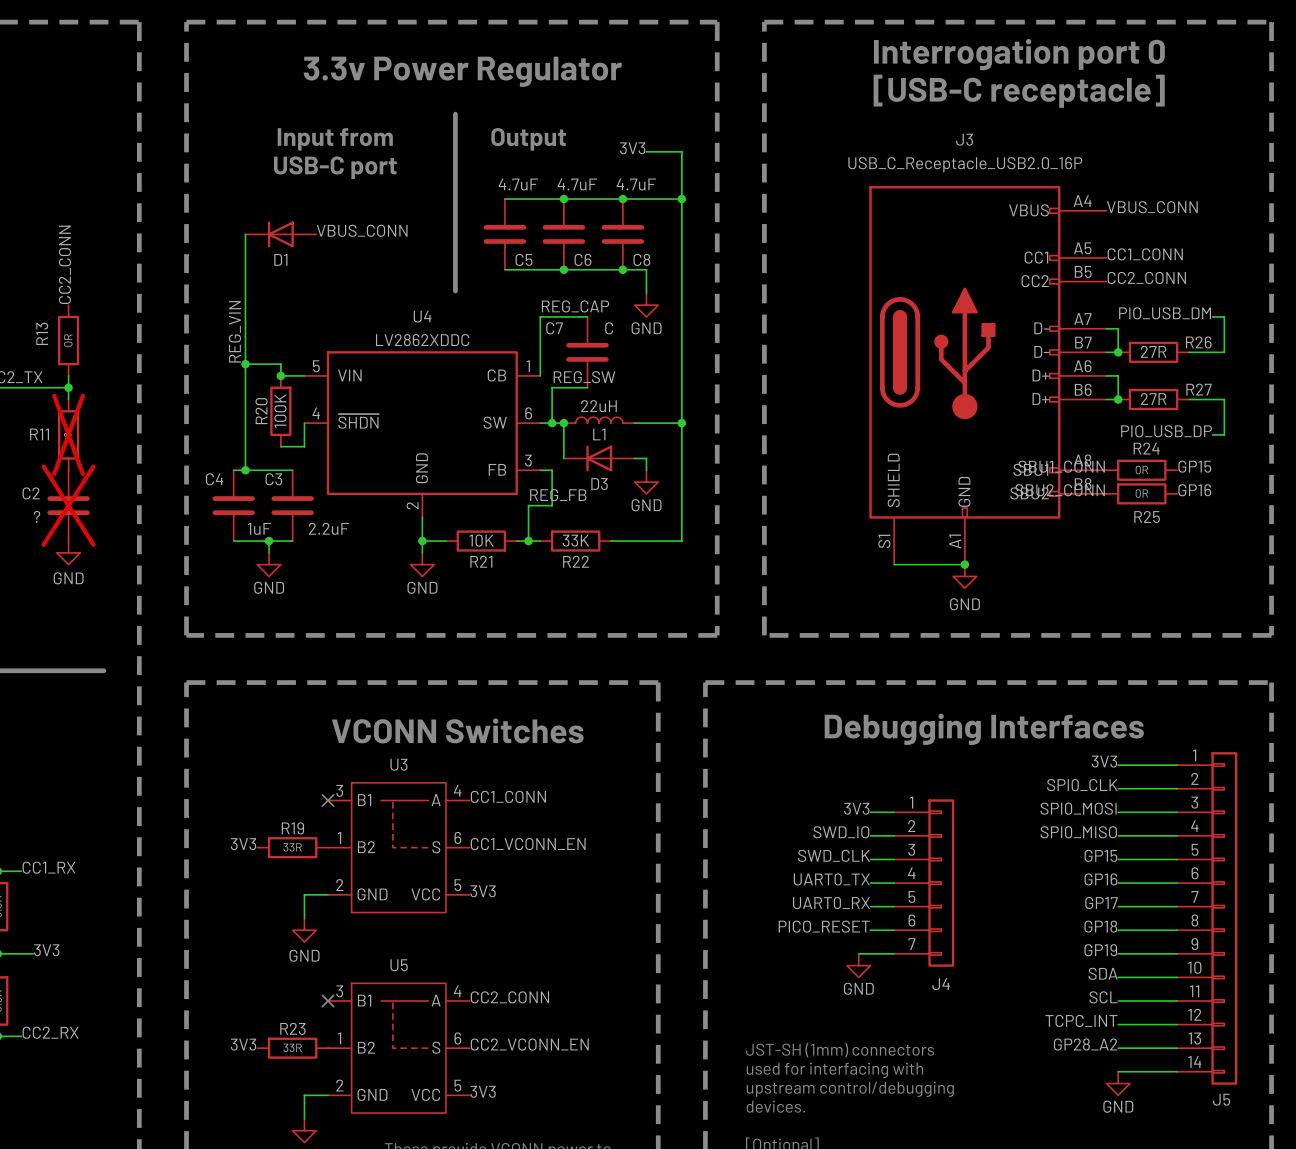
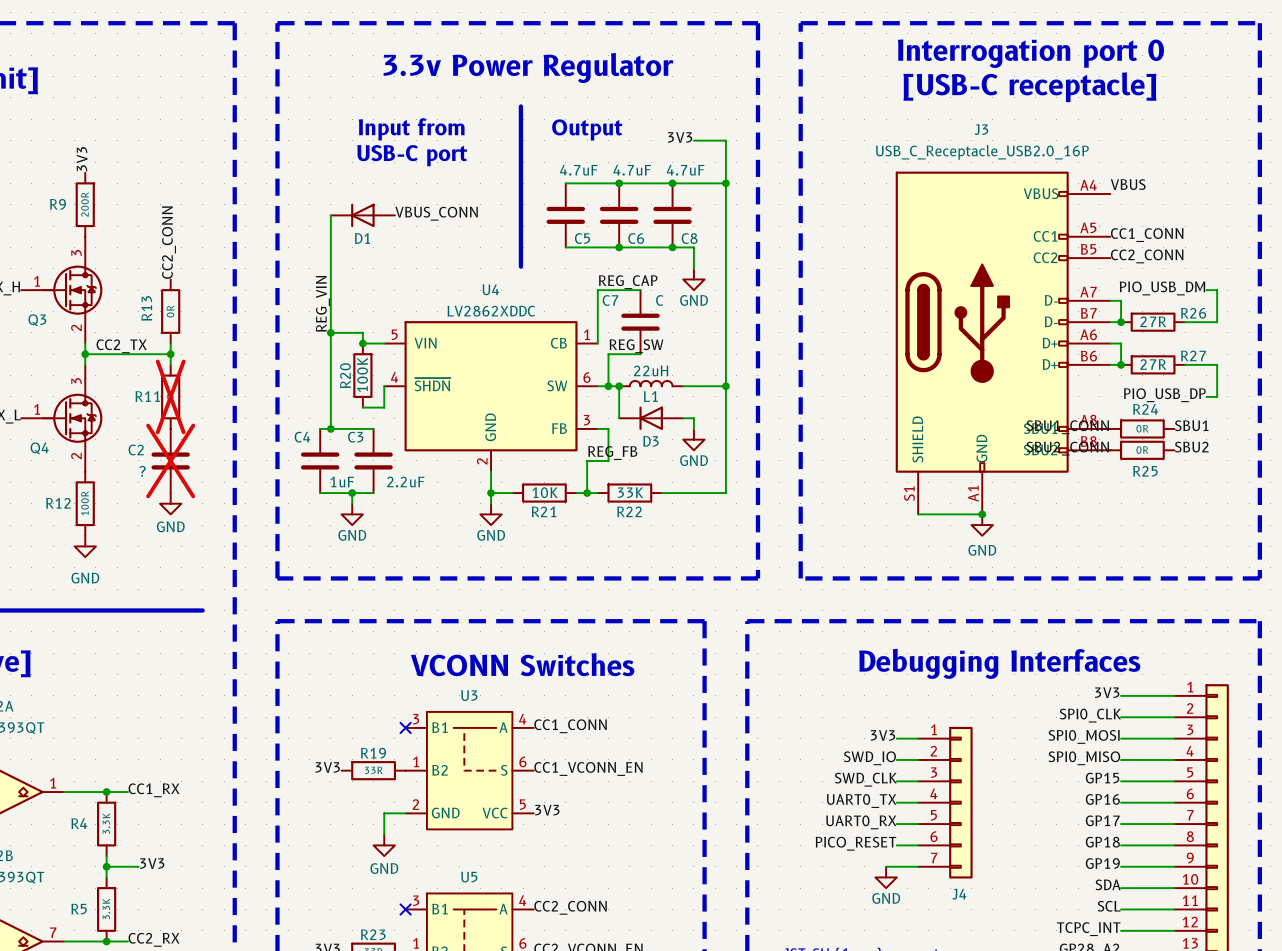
label: VBUS_CONN (1152, 207) -> VBUS (1128, 184)
label: GP15 (1194, 466) -> SBU1 (1191, 425)
label: GP16 (1194, 490) -> SBU2 (1191, 447)

